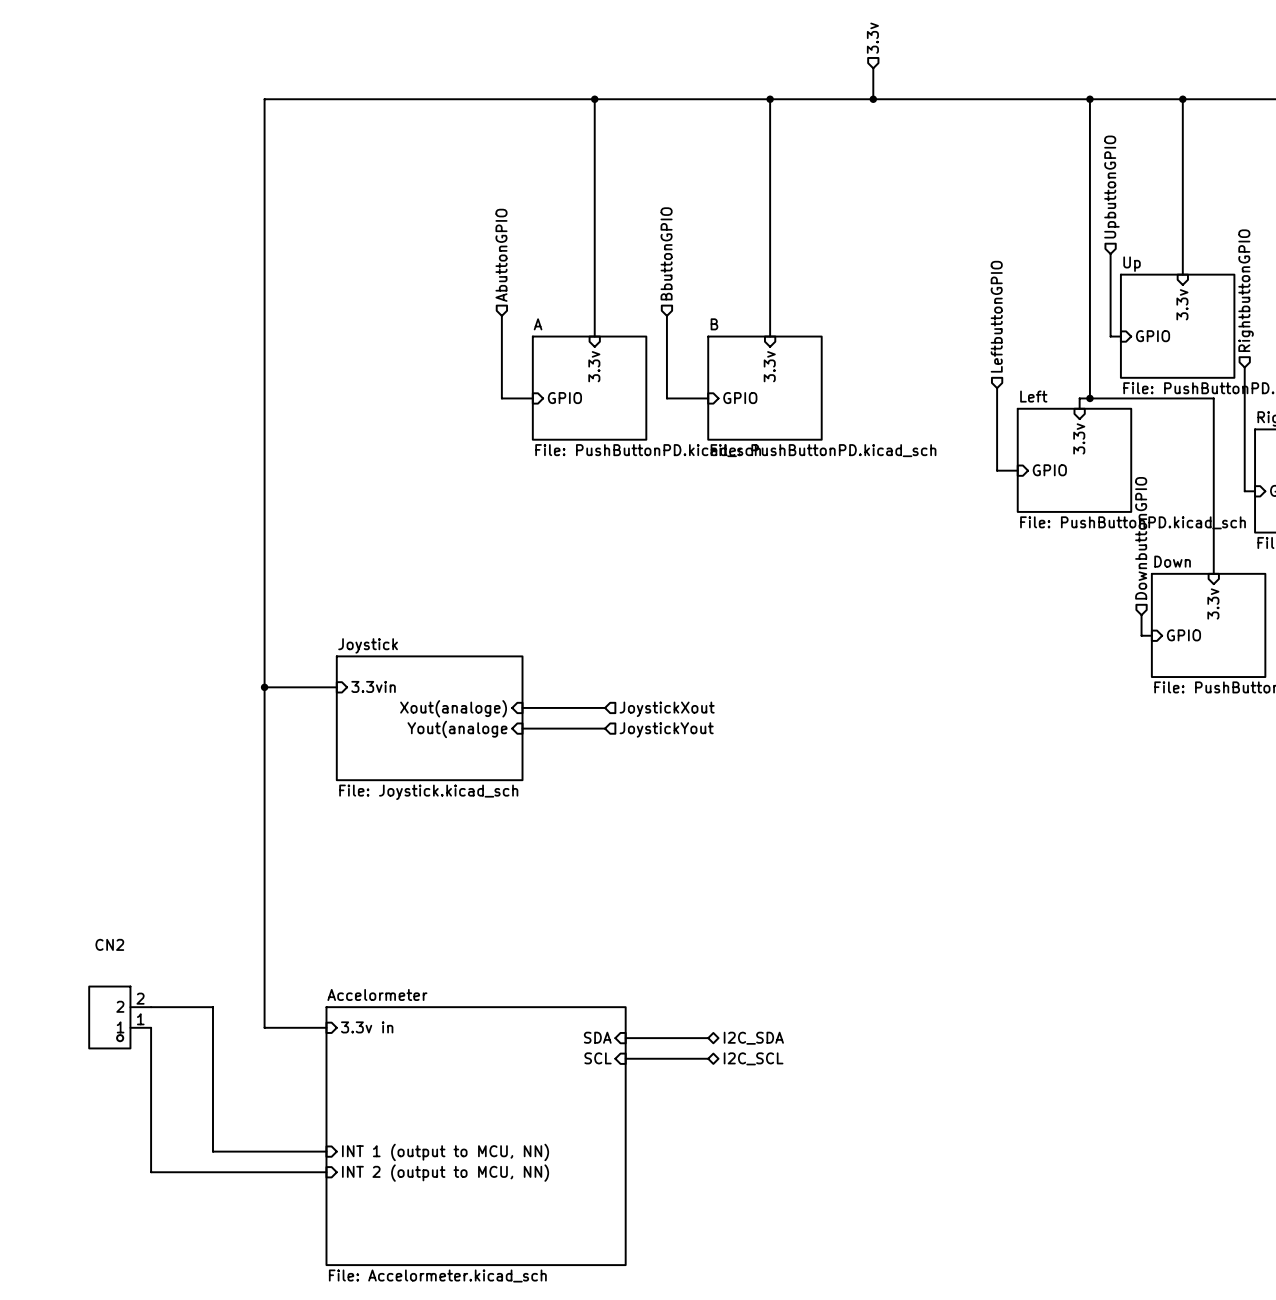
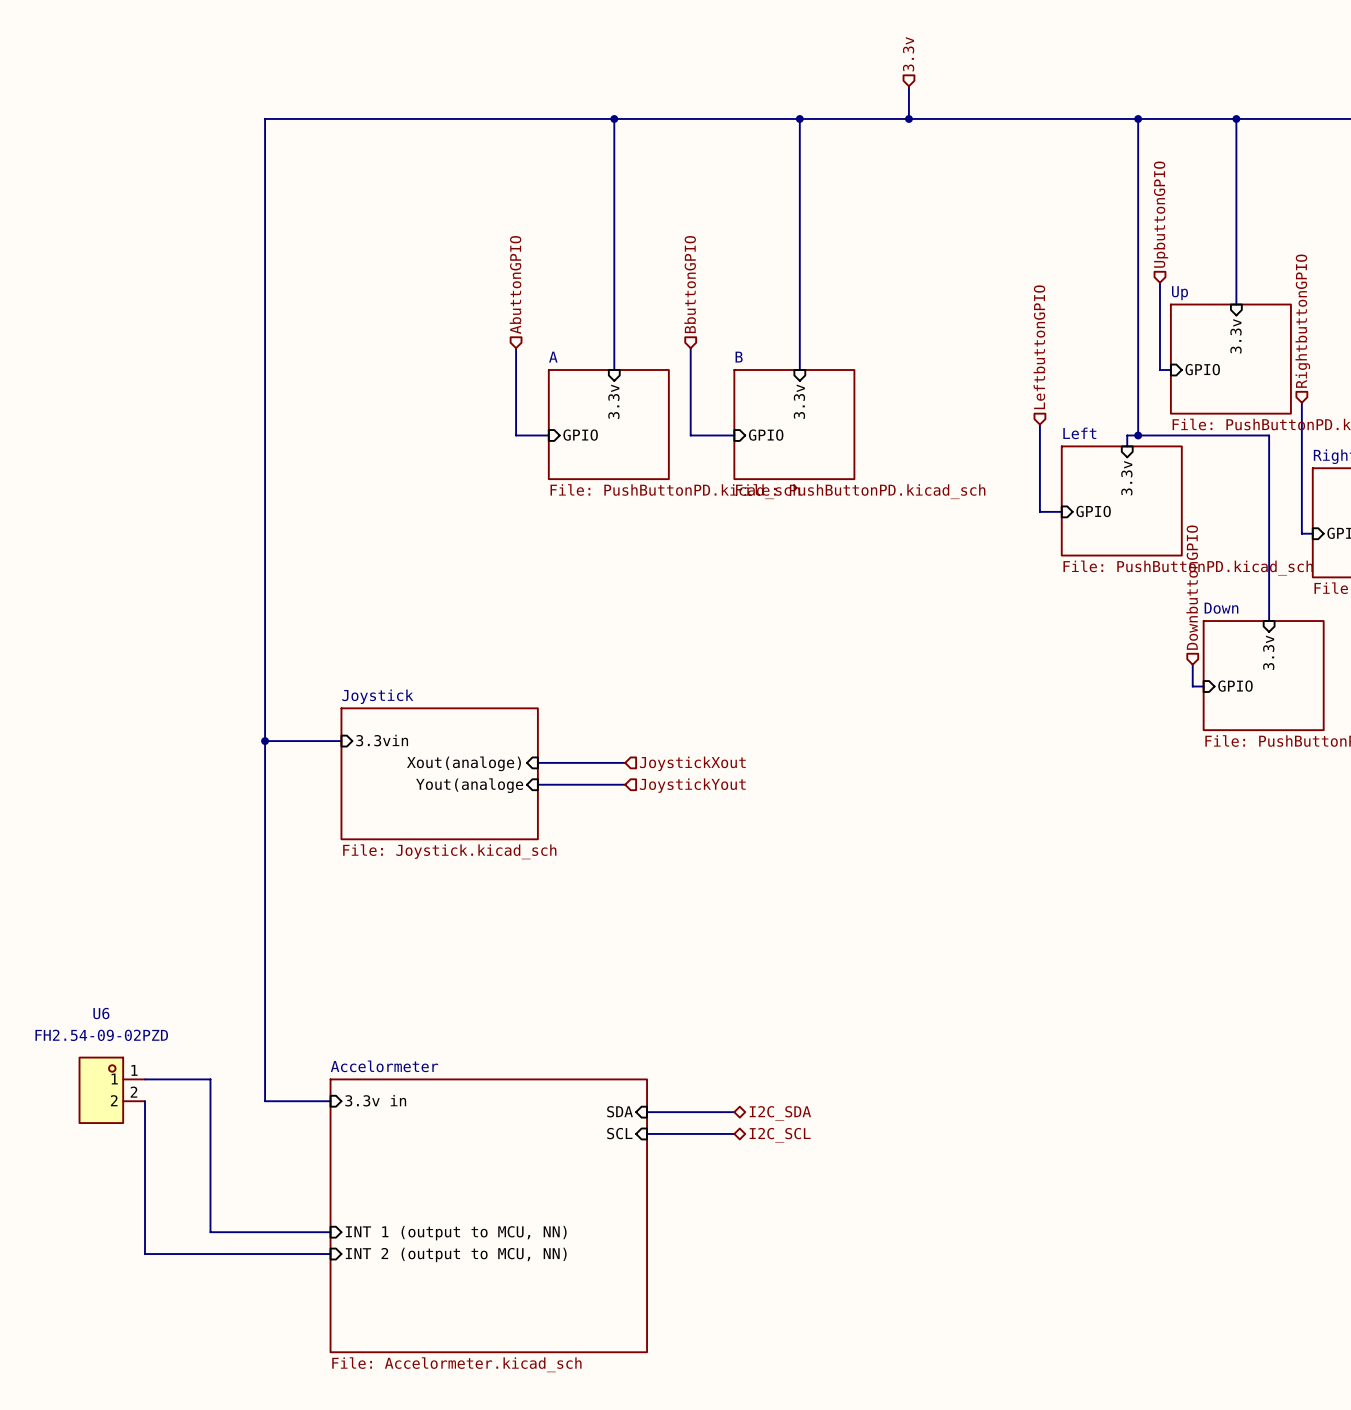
CN2: (120, 1017) -> none
U6: none -> FH2.54-09-02PZD (112, 1090)

